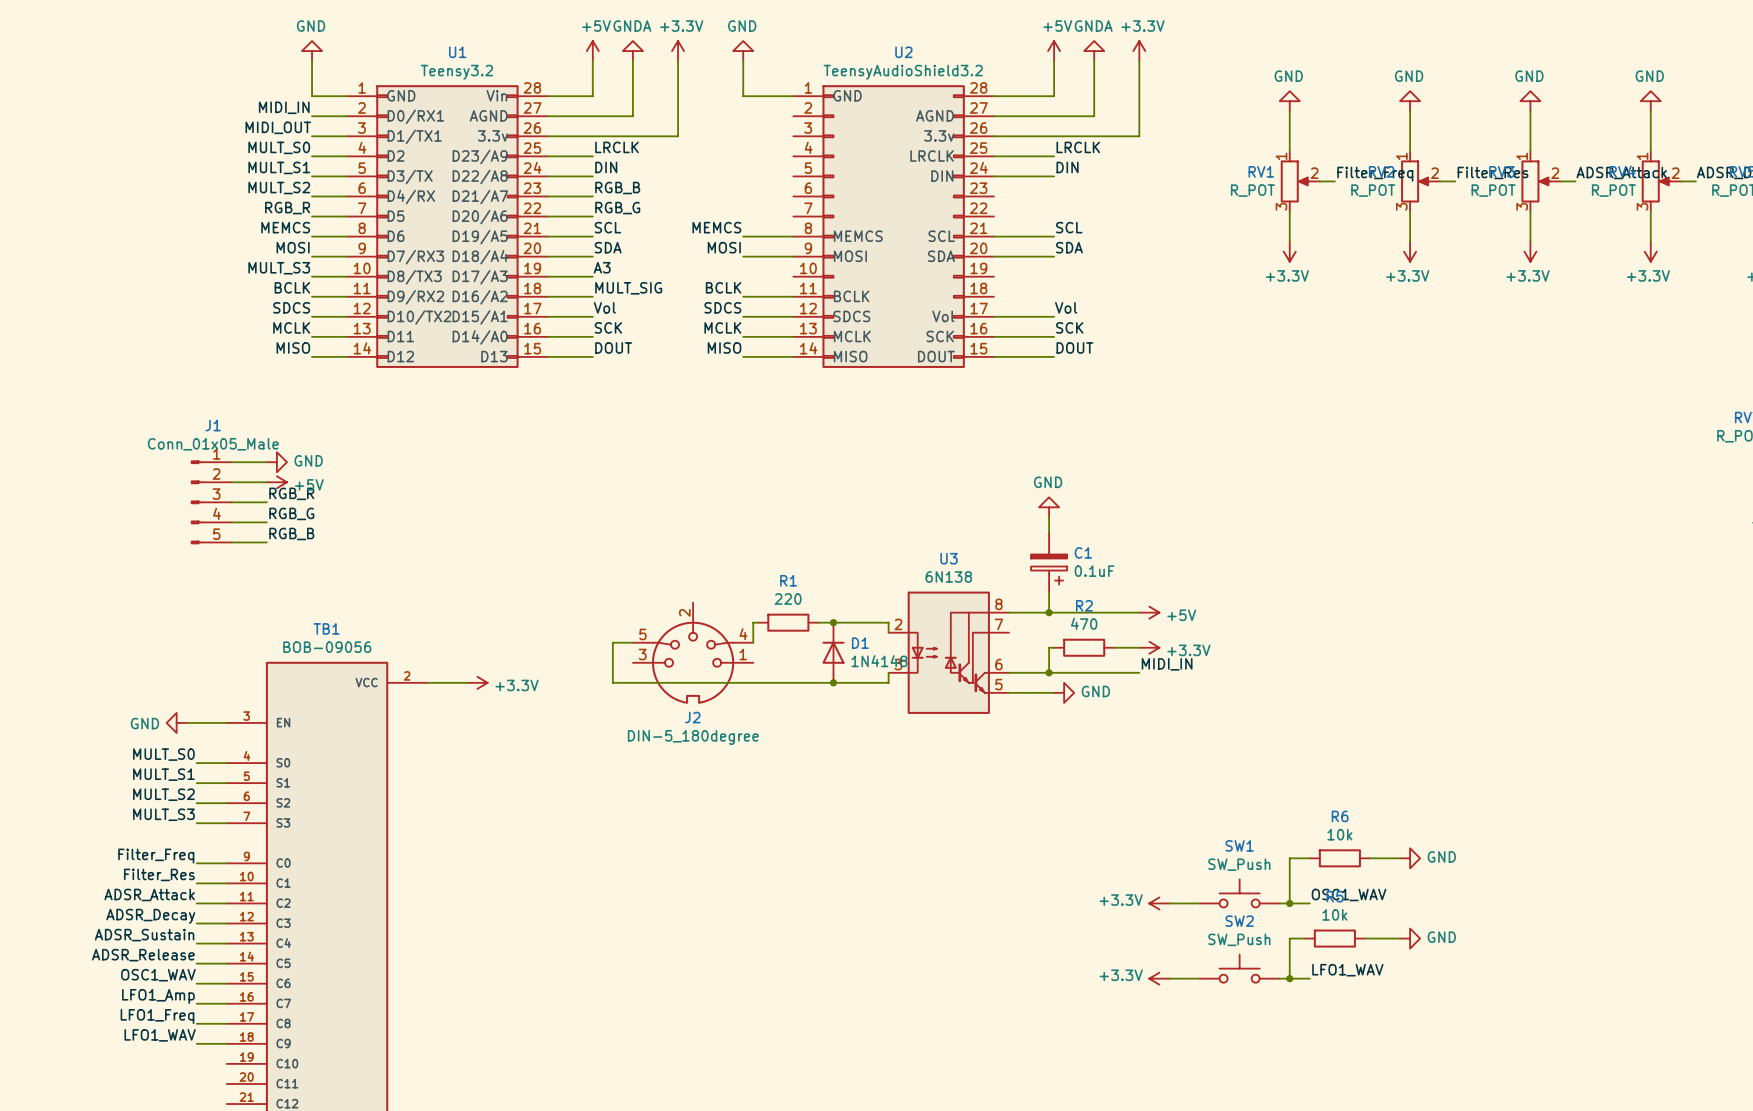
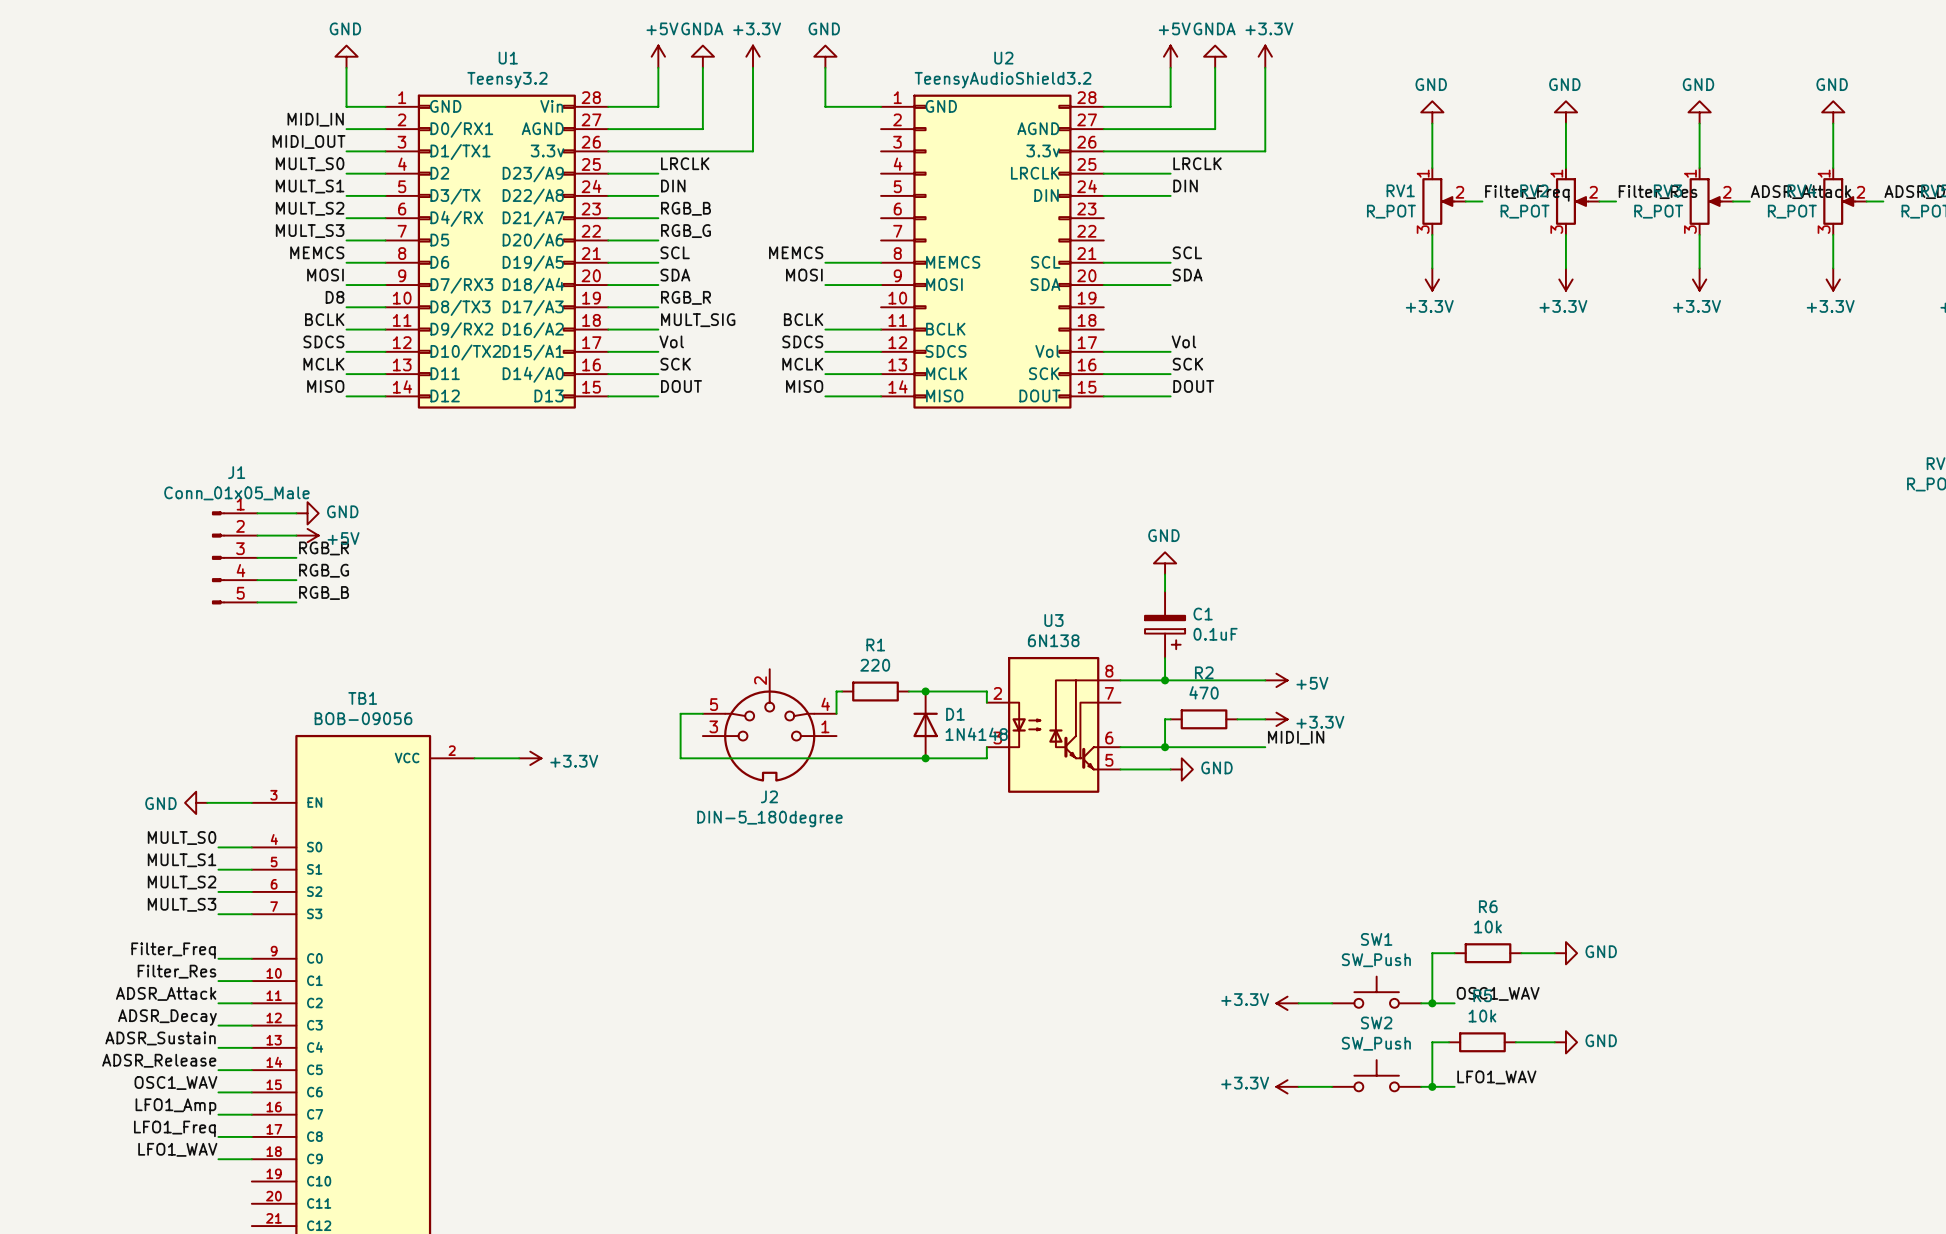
label: RGB_R (287, 208) -> MULT_S3 (310, 231)
label: A3 (602, 267) -> RGB_R (686, 297)
label: MULT_S3 (279, 268) -> D8 (335, 297)

